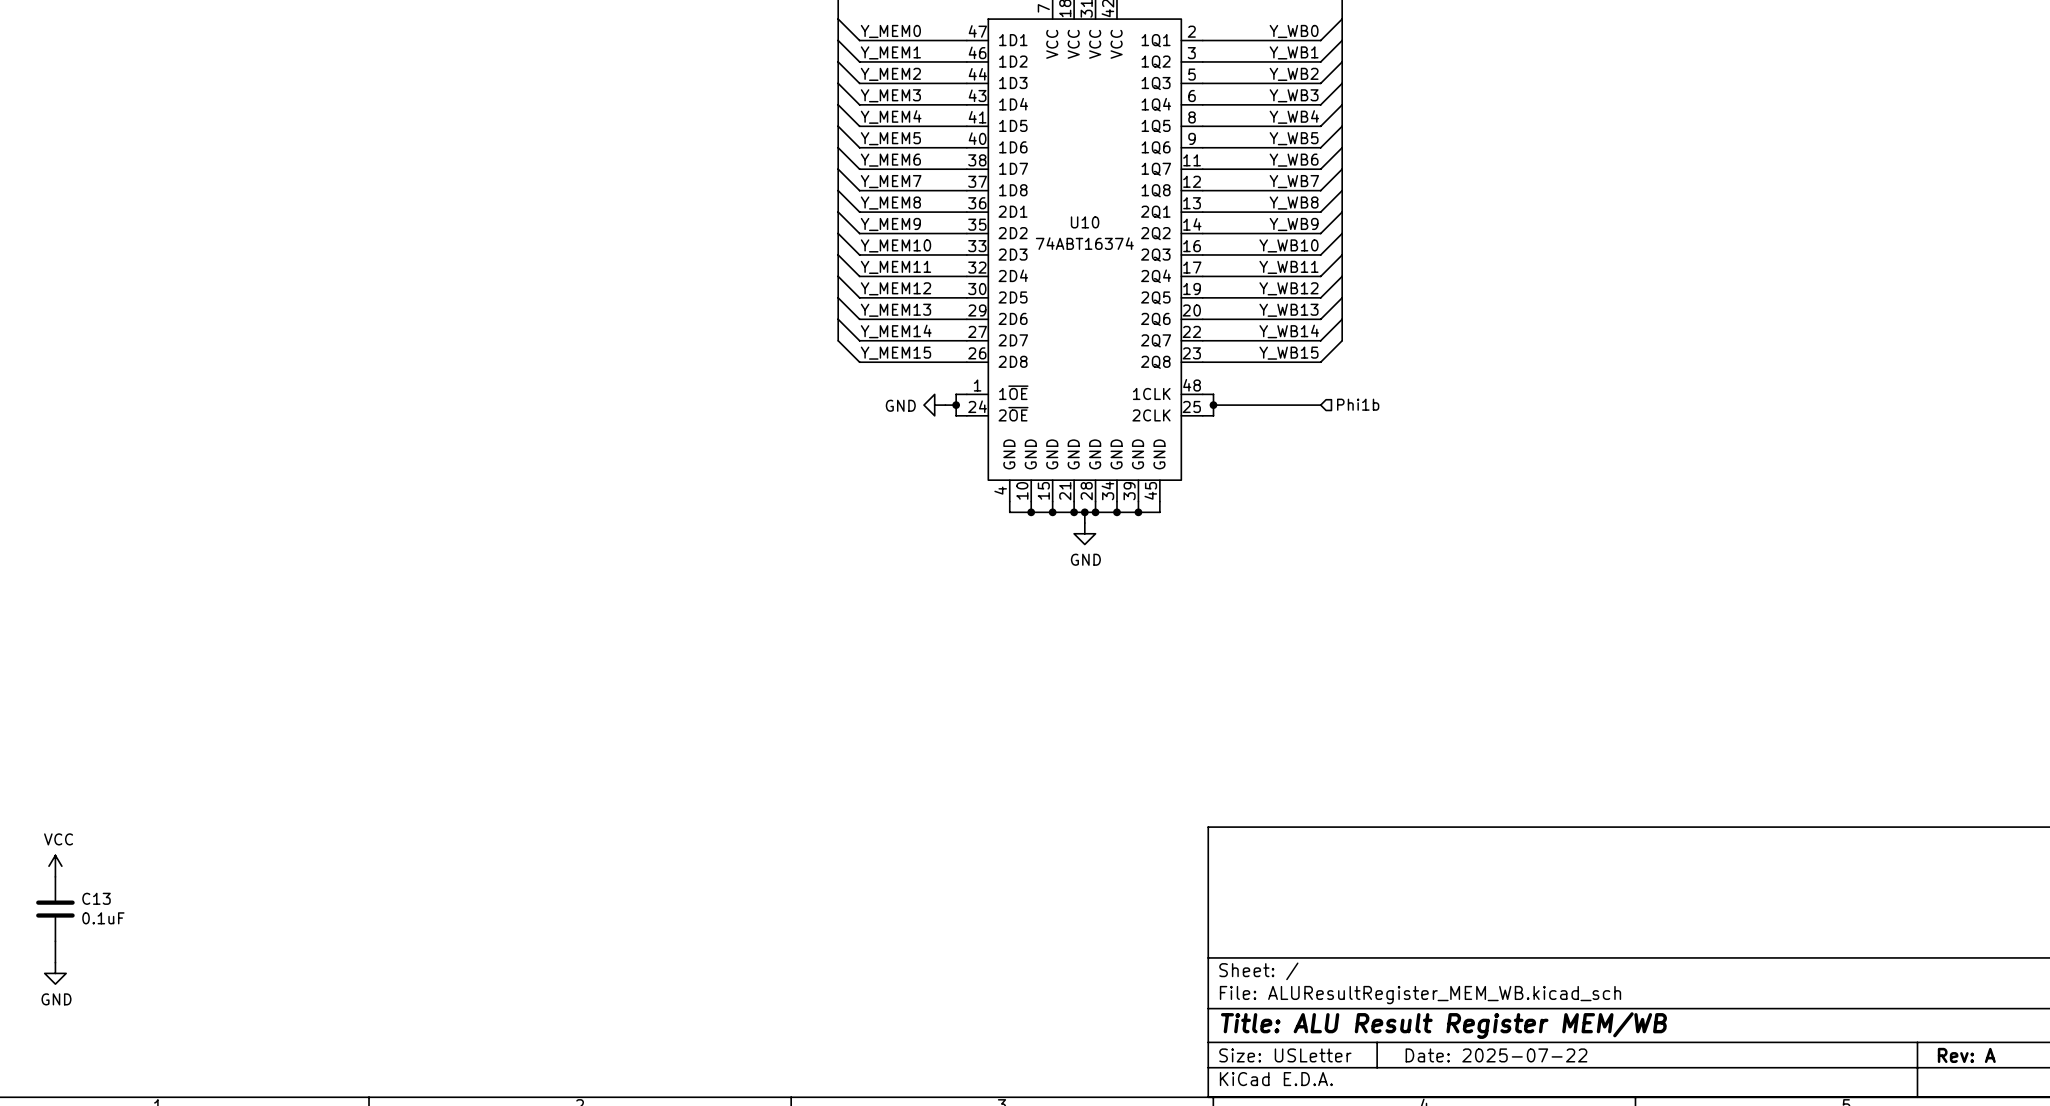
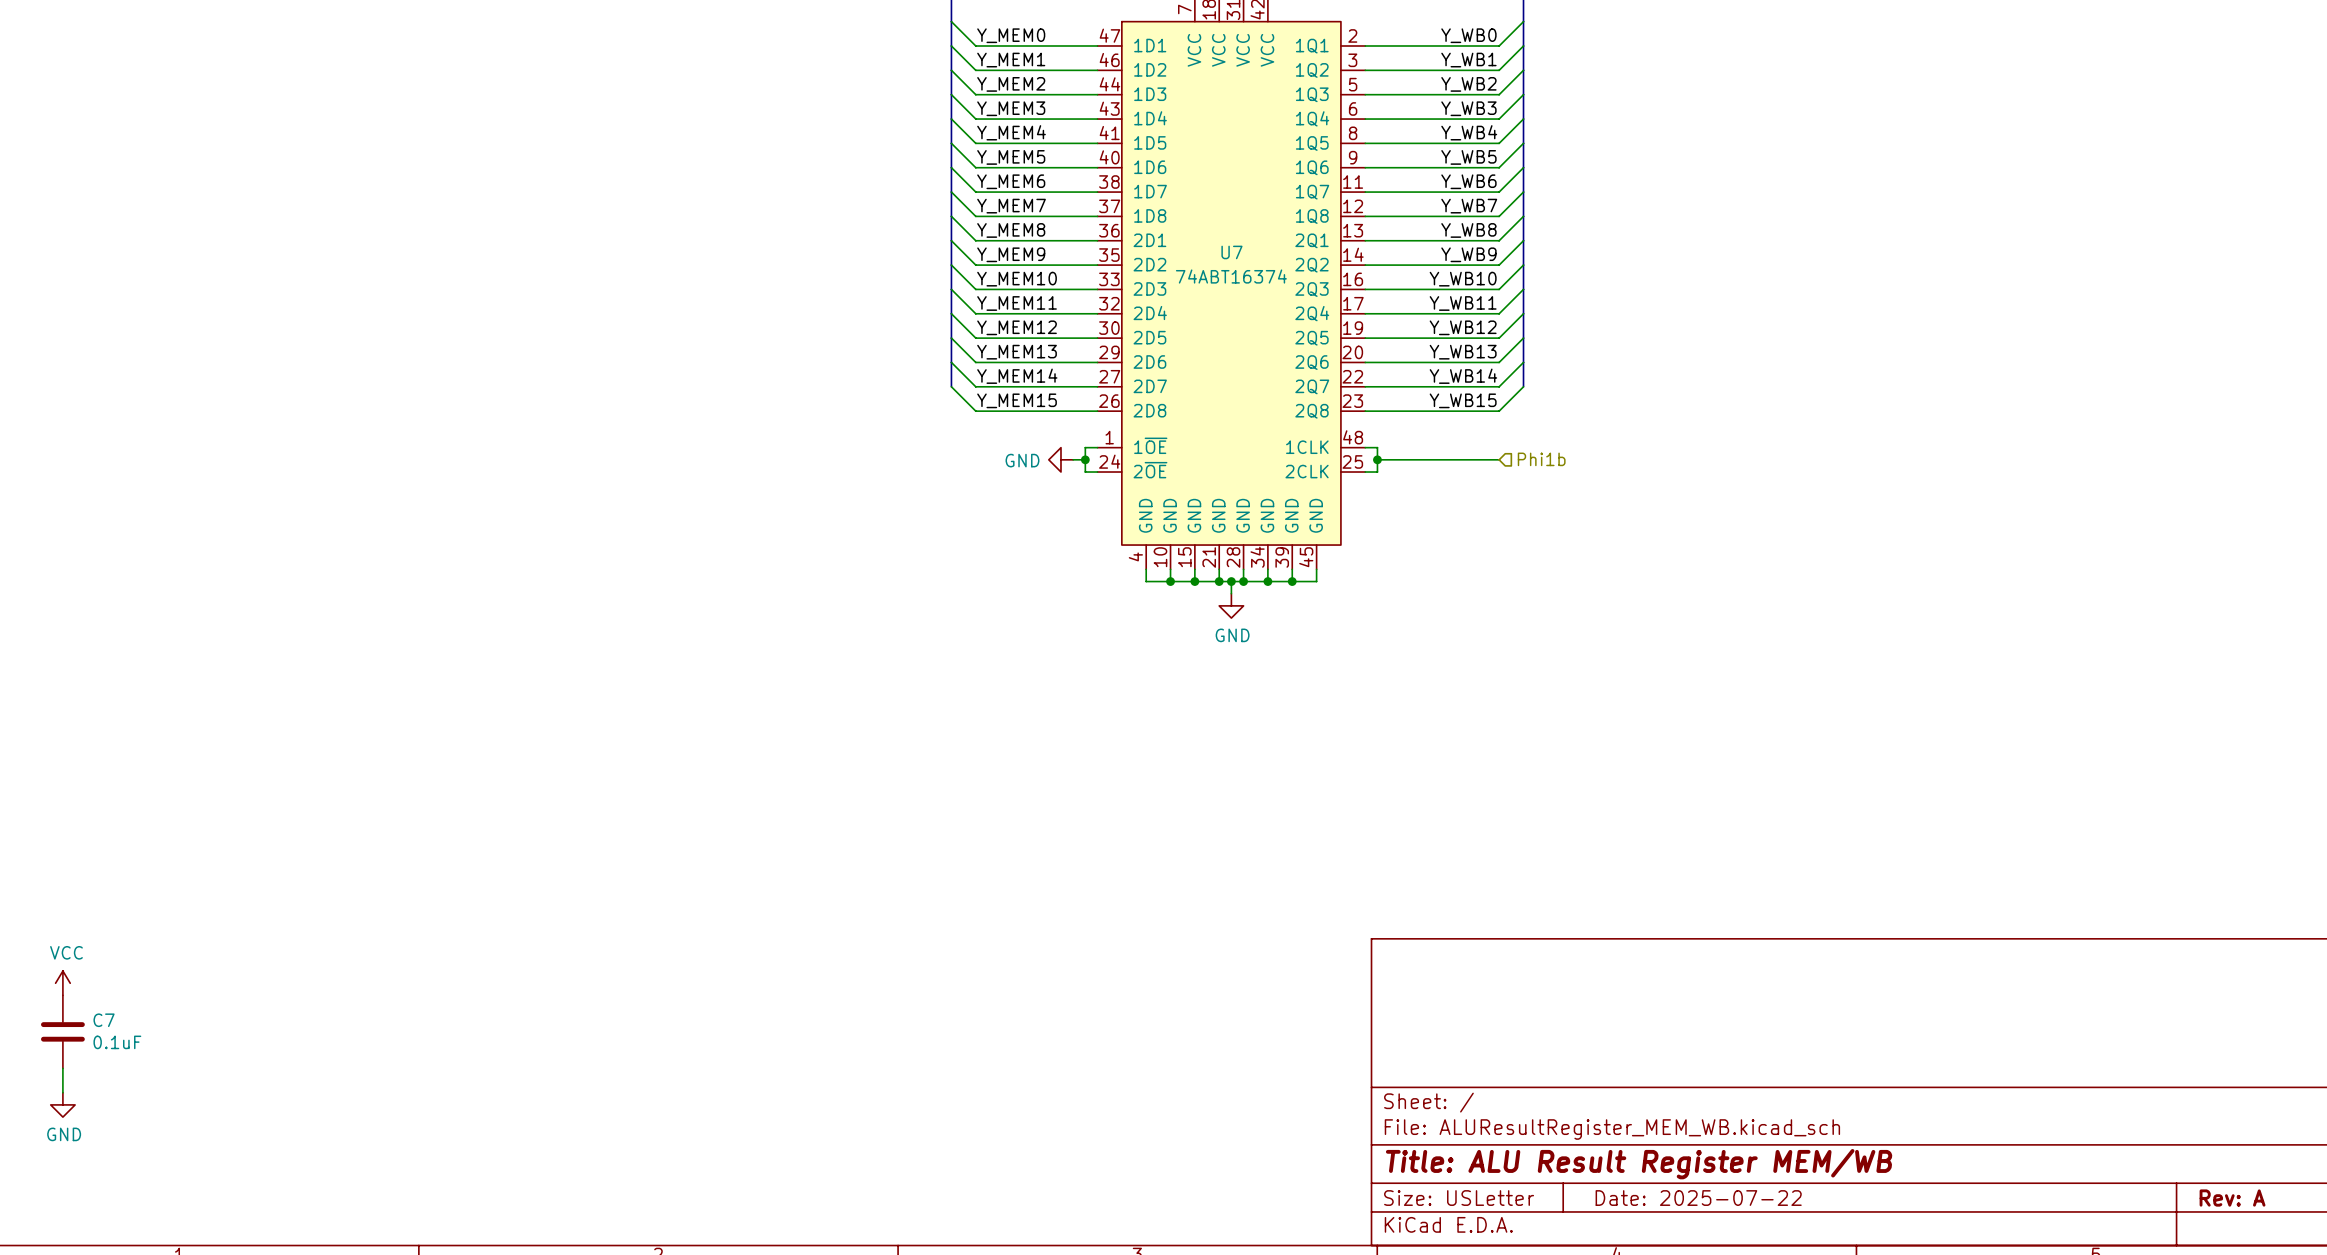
U10 name: U10 (1085, 222) -> U7 (1231, 252)
C13 name: C13 (96, 898) -> C7 (104, 1020)

